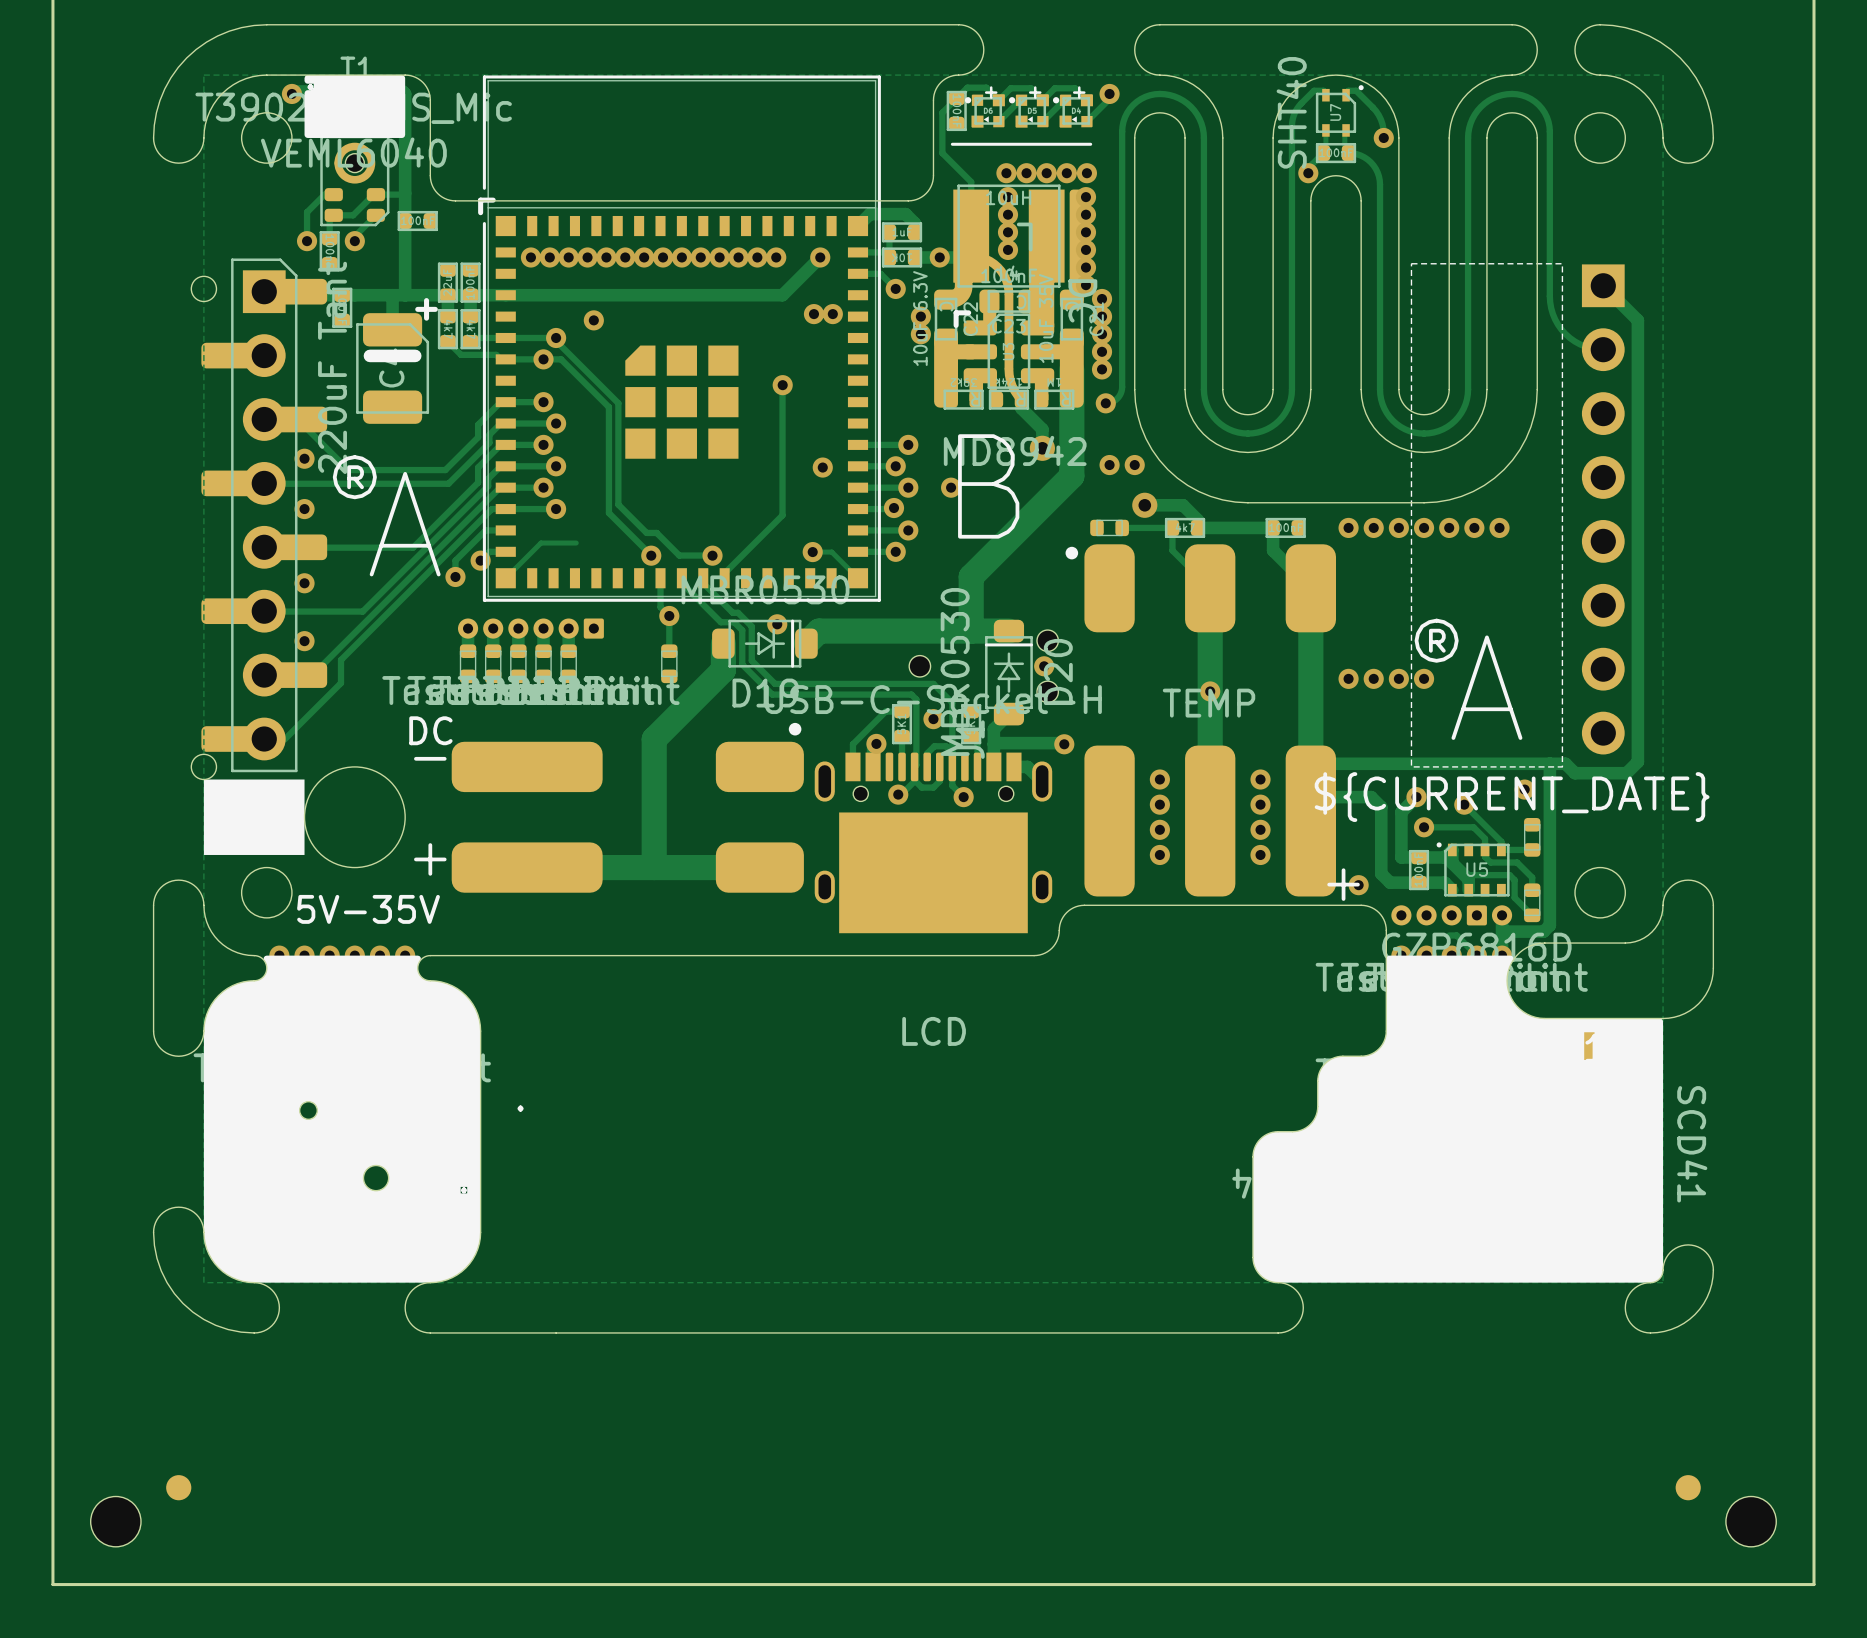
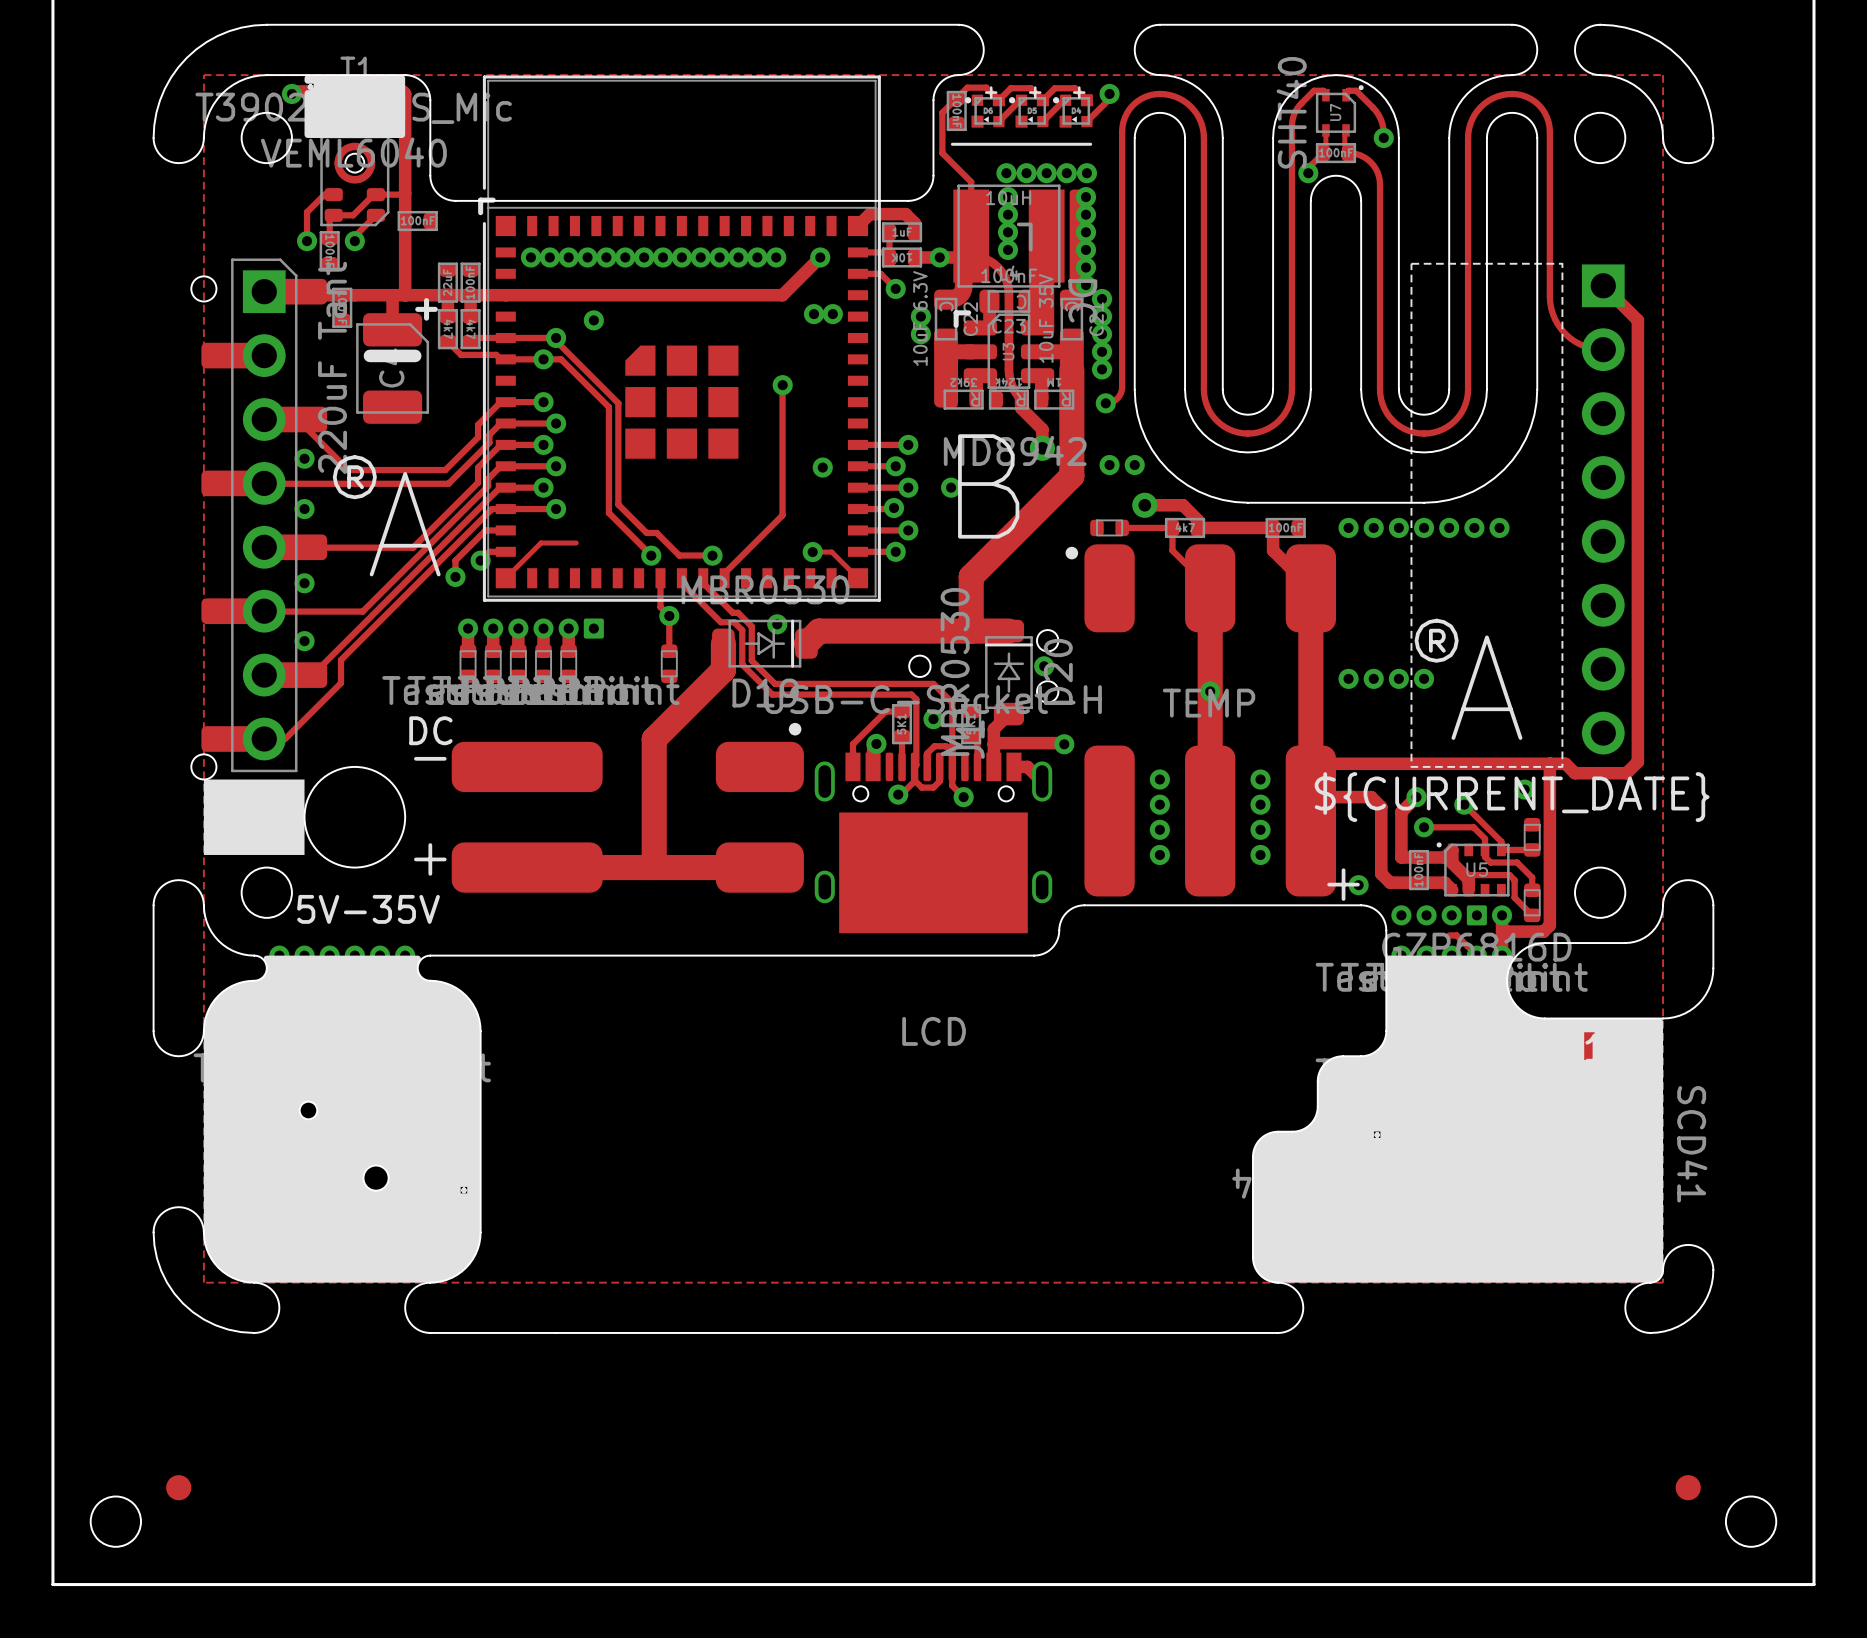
drawing shape: [1252, 955, 1664, 1283] -> [1252, 955, 1664, 1283]
text: . (520, 1108) -> none
text: none -> . (1377, 1134)

